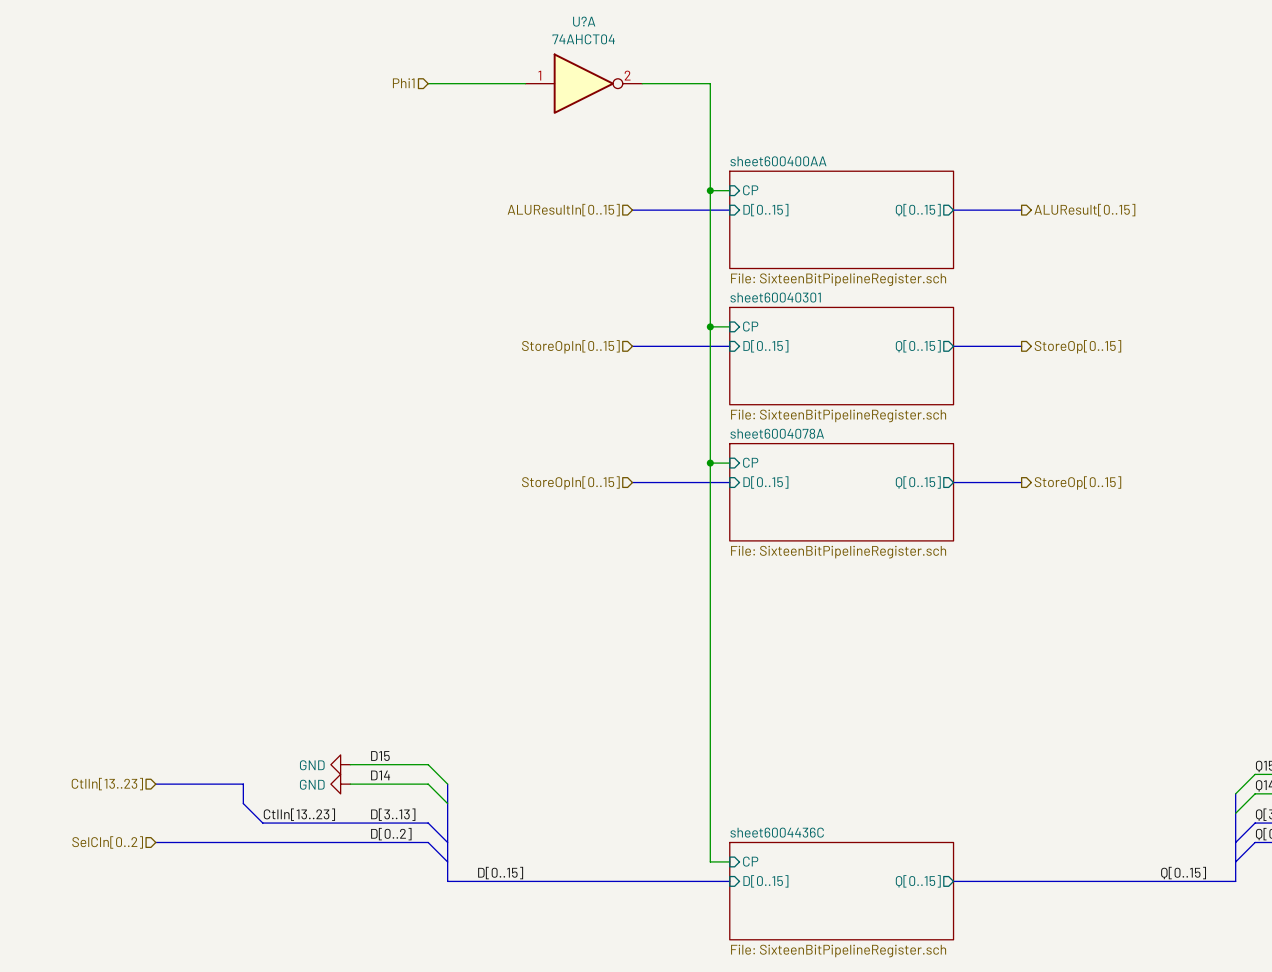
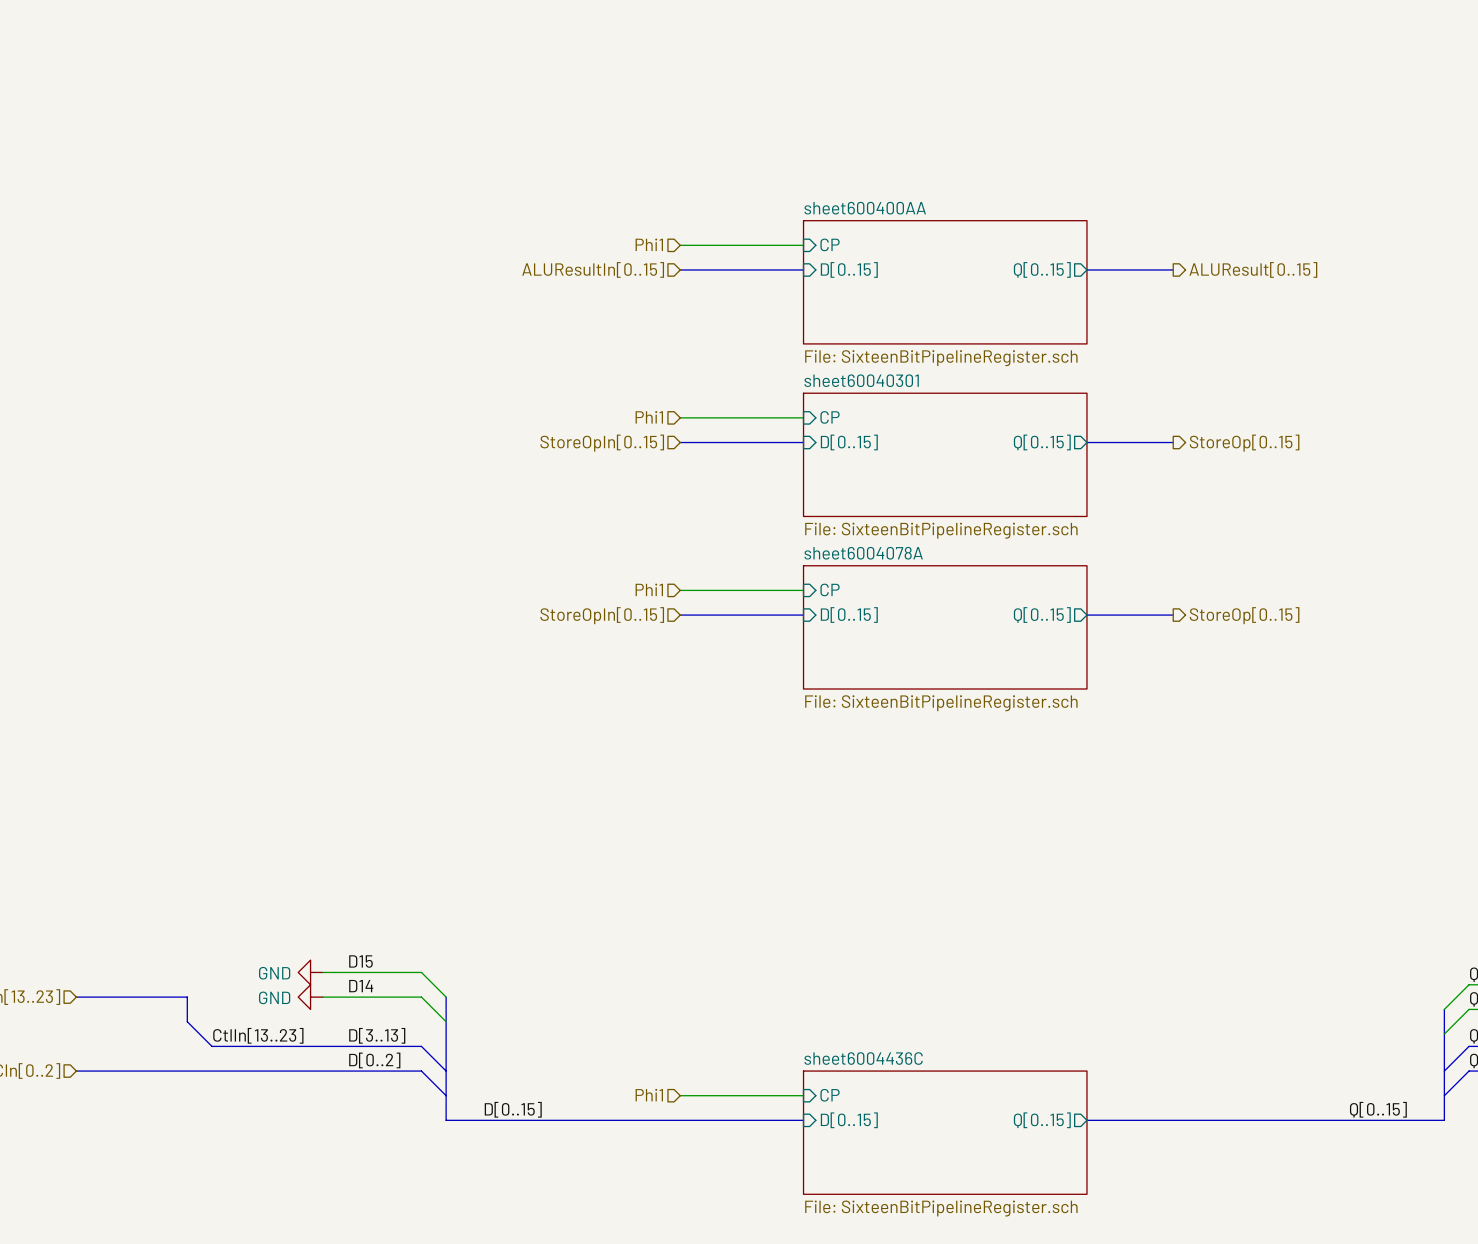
hierarchical label: Phi1 (403, 83) -> none
wire: (428, 83) (525, 83) -> none
U?A: 74AHCT04 (583, 83) -> none
wire: (642, 83) (710, 83) (710, 861) -> (680, 1095) (778, 1095)
hierarchical label: none -> Phi1 (649, 244)
wire: none -> (680, 245) (778, 245)
junction: (710, 190) -> none
hierarchical label: none -> Phi1 (649, 417)
wire: none -> (680, 417) (778, 417)
junction: (710, 326) -> none
hierarchical label: none -> Phi1 (649, 589)
wire: none -> (680, 590) (778, 590)
junction: (710, 463) -> none
hierarchical label: none -> Phi1 (649, 1095)

